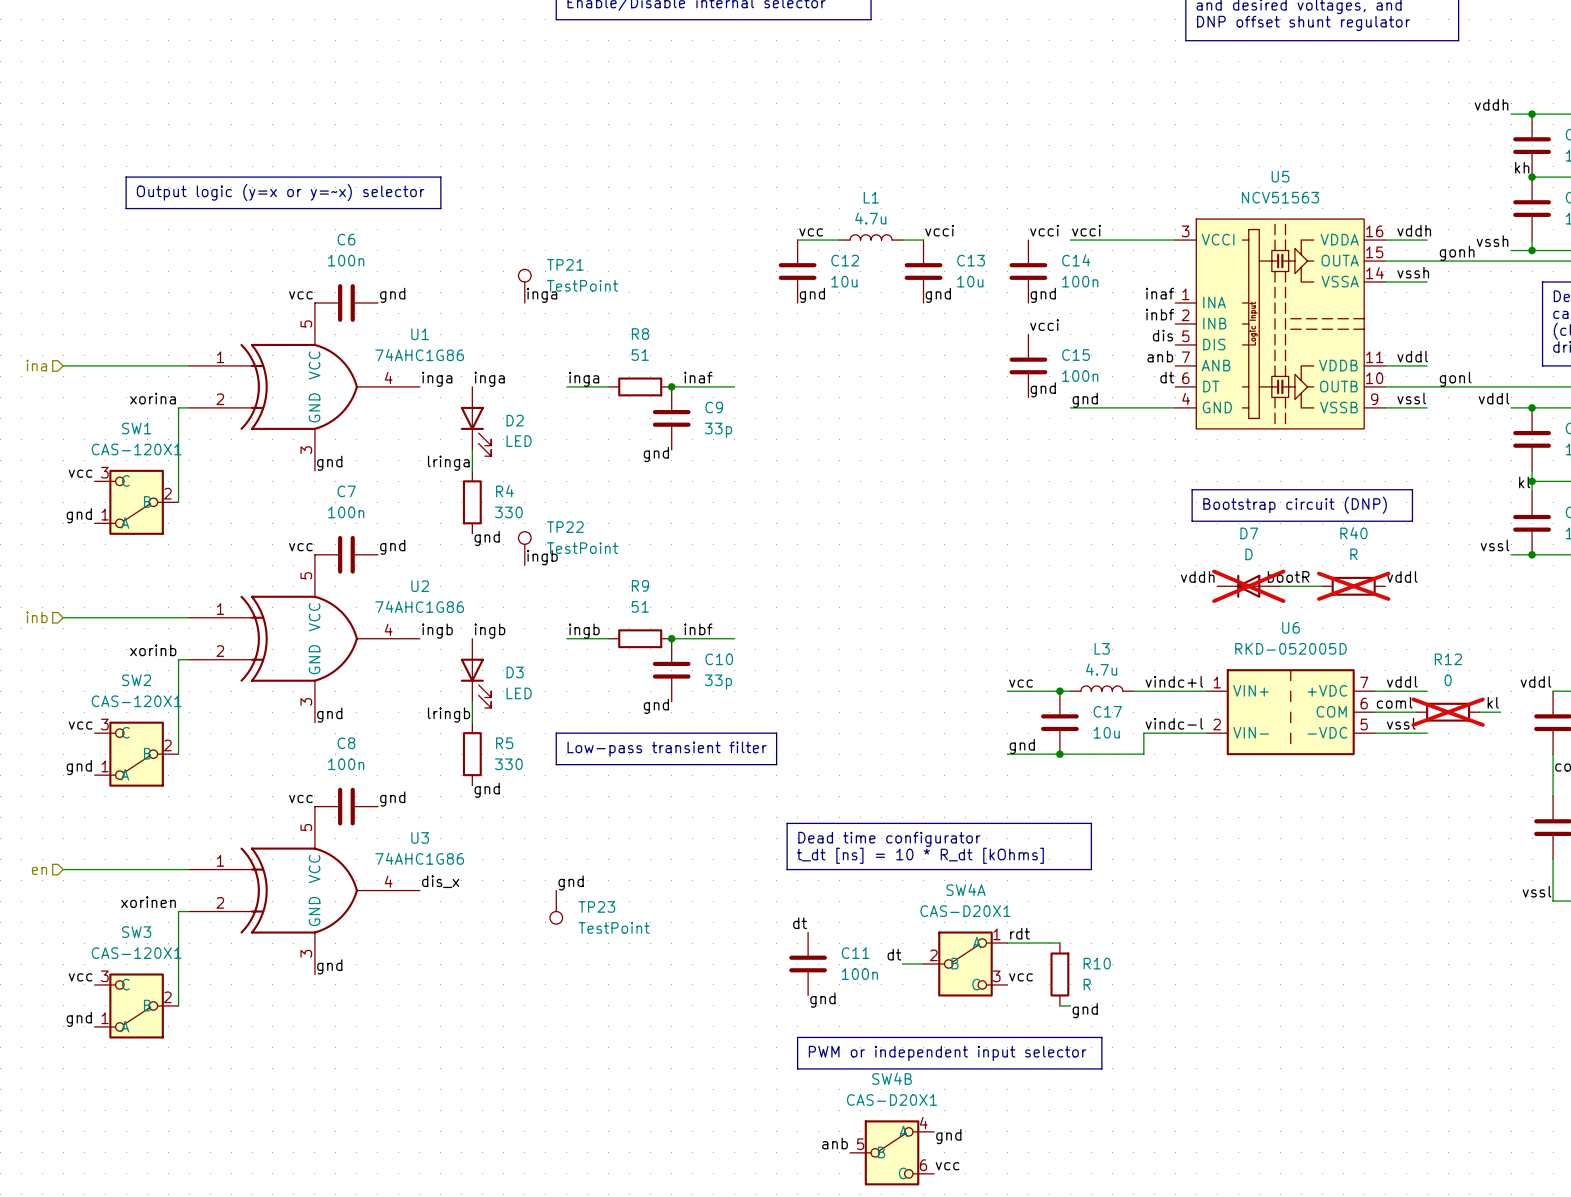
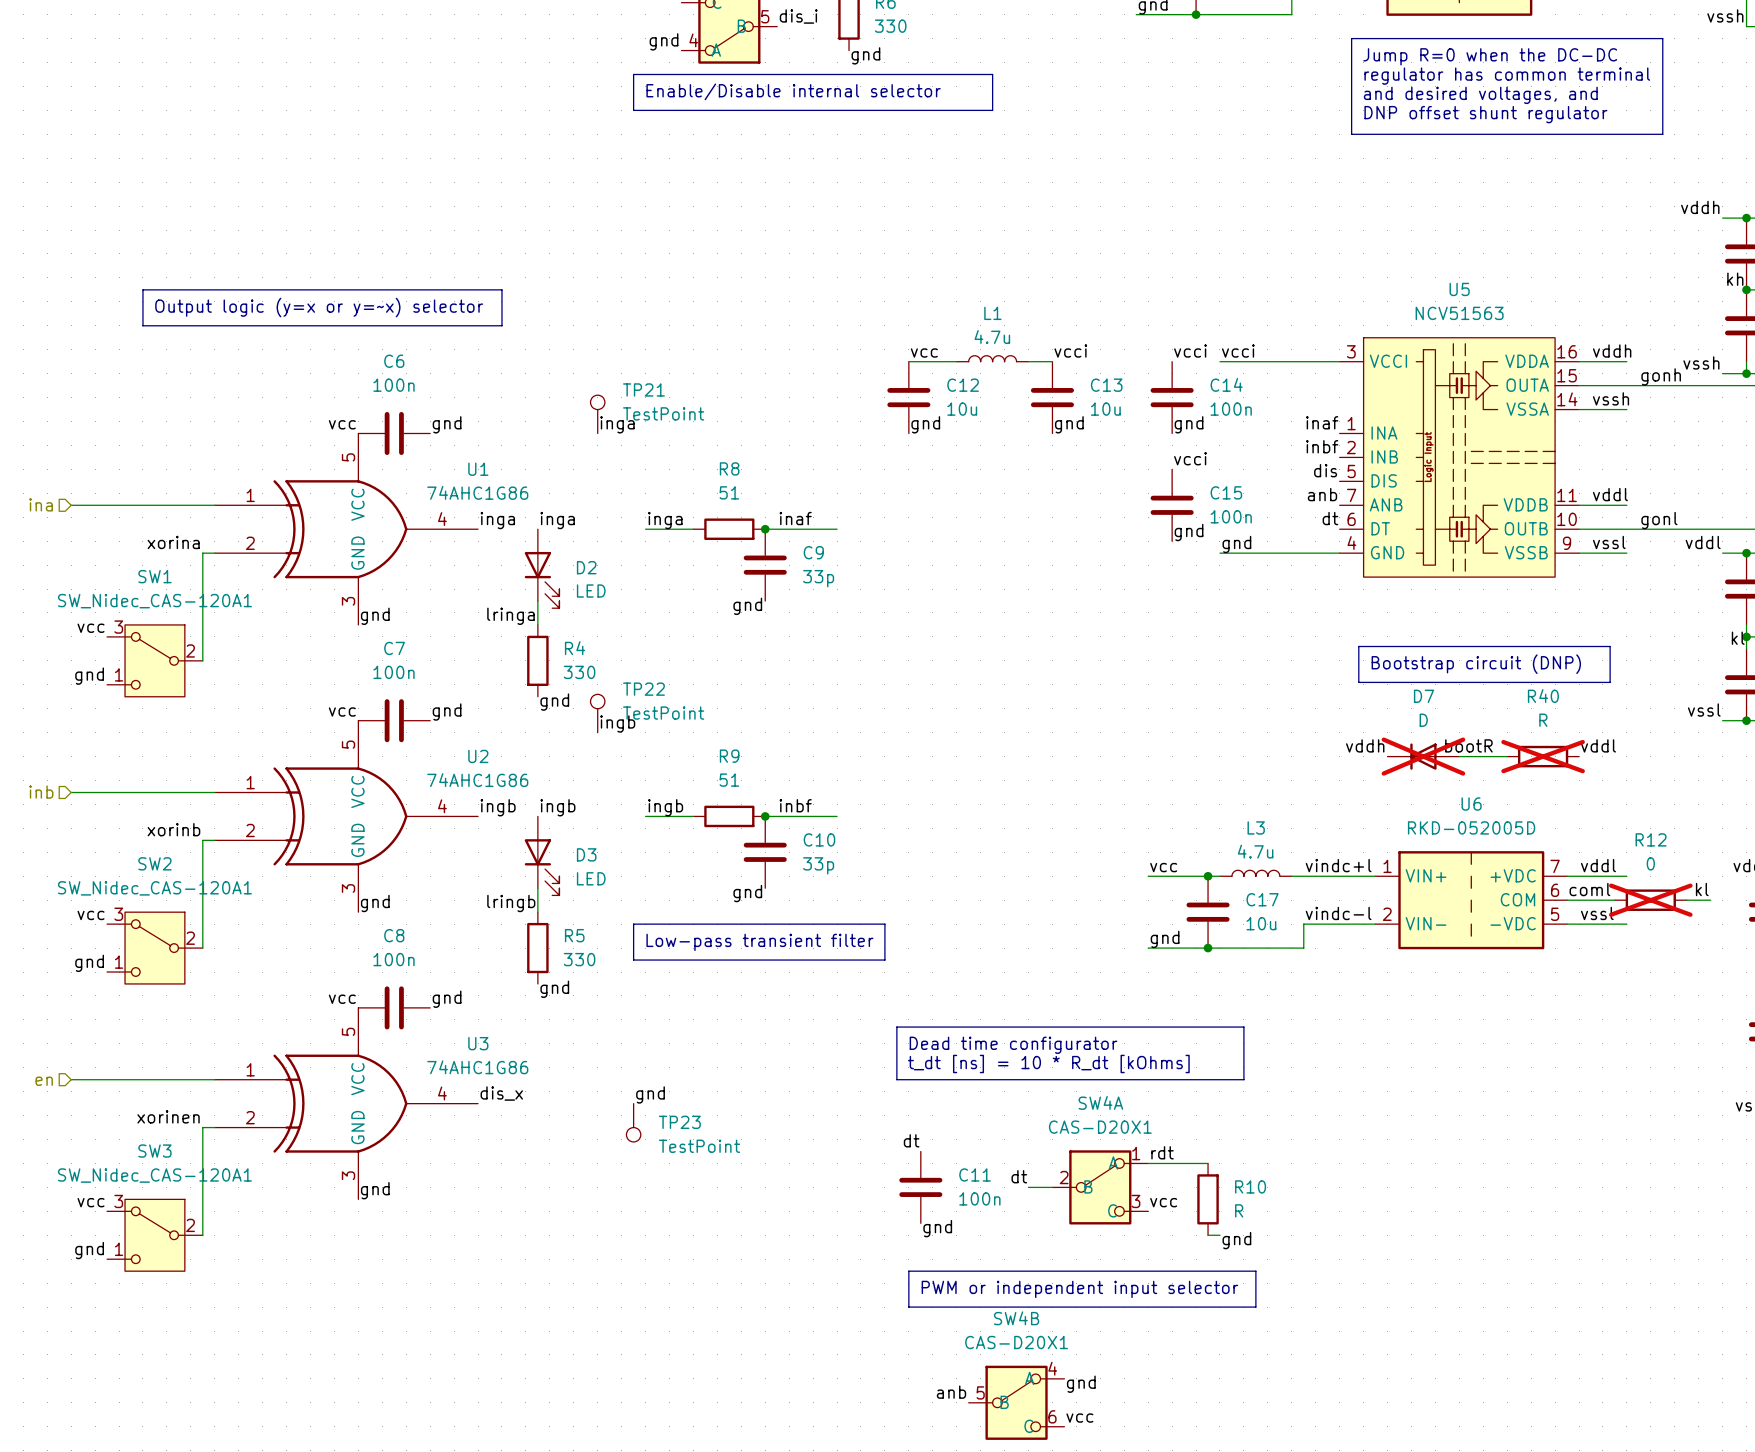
SW1 value: CAS-120X1 (136, 449) -> SW_Nidec_CAS-120A1 (154, 601)
SW1 symbol: [94, 469, 179, 535] -> [107, 624, 203, 697]
SW2 value: CAS-120X1 (136, 701) -> SW_Nidec_CAS-120A1 (154, 888)
SW2 symbol: [94, 721, 179, 787] -> [107, 912, 203, 984]
SW3 value: CAS-120X1 (136, 953) -> SW_Nidec_CAS-120A1 (154, 1175)
SW3 symbol: [94, 973, 179, 1039] -> [107, 1199, 203, 1272]

